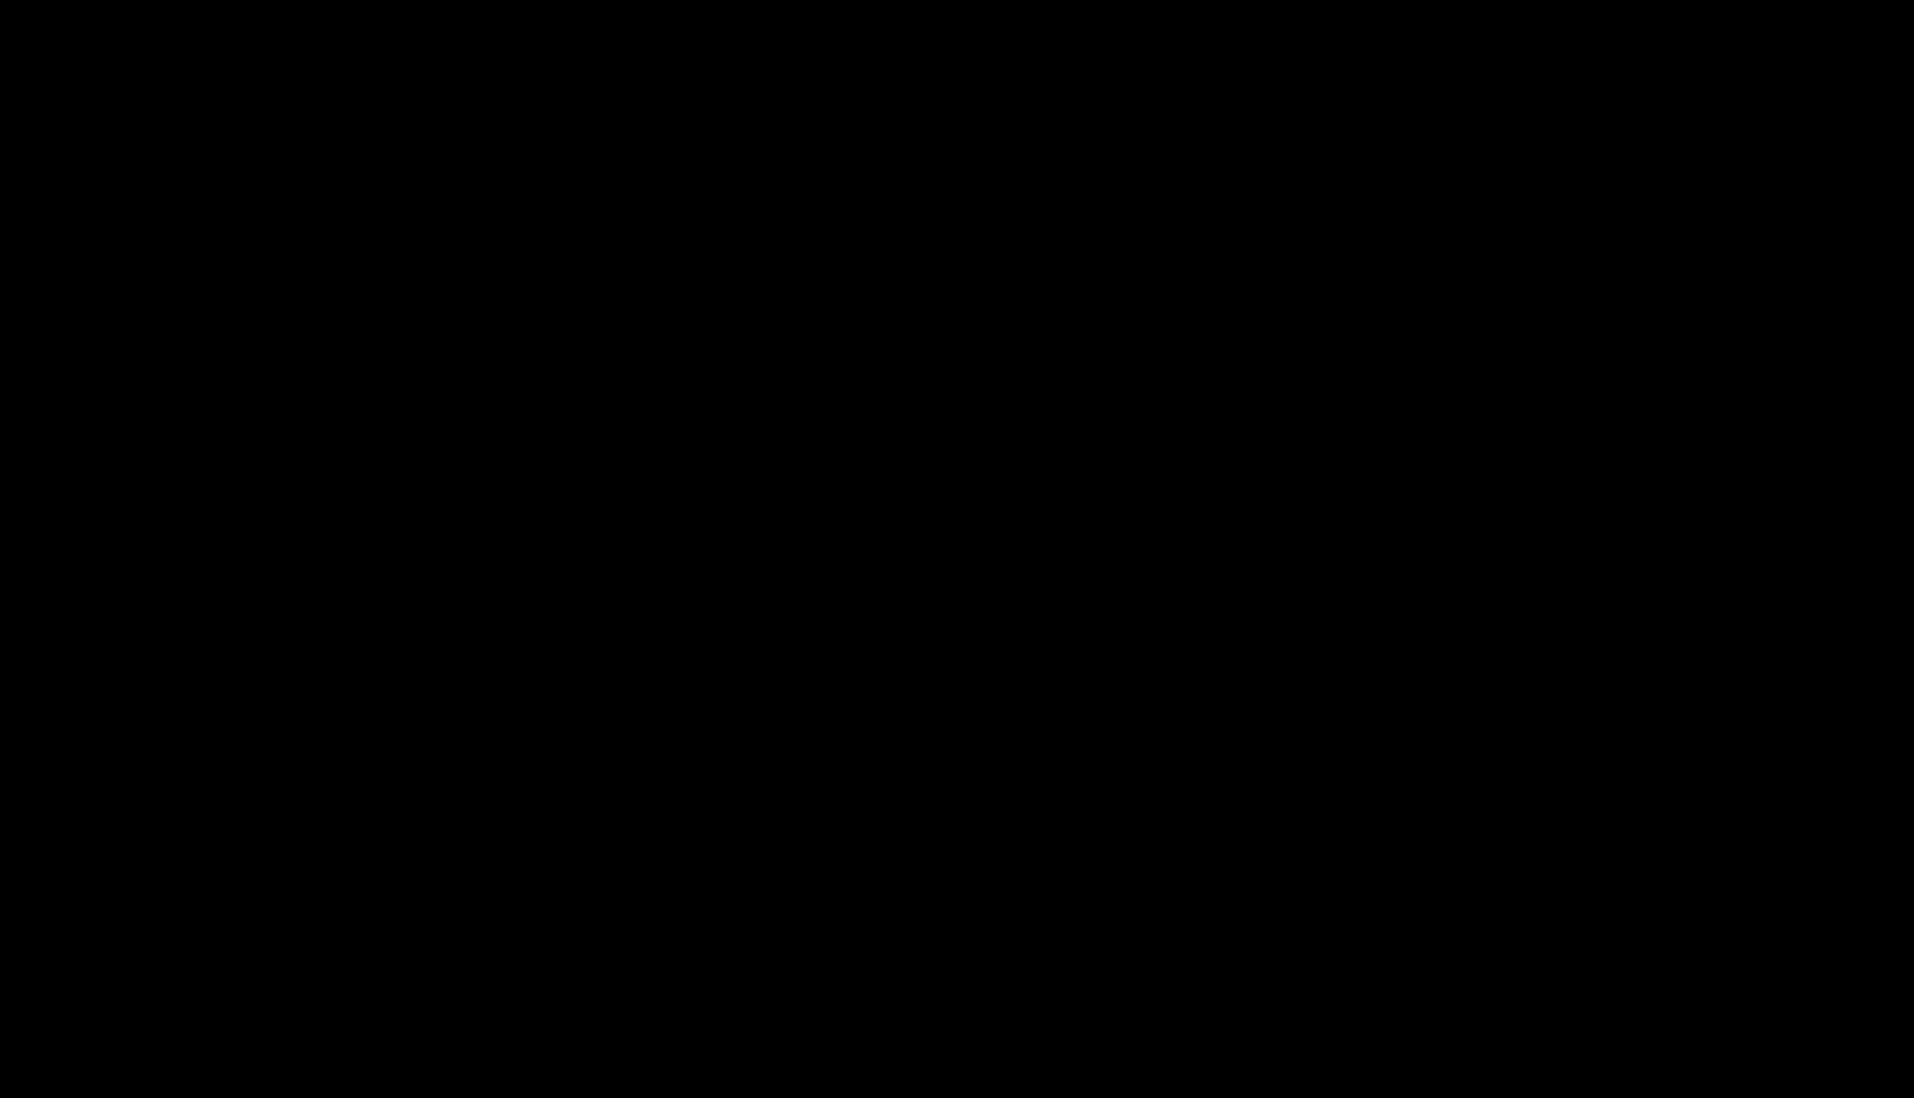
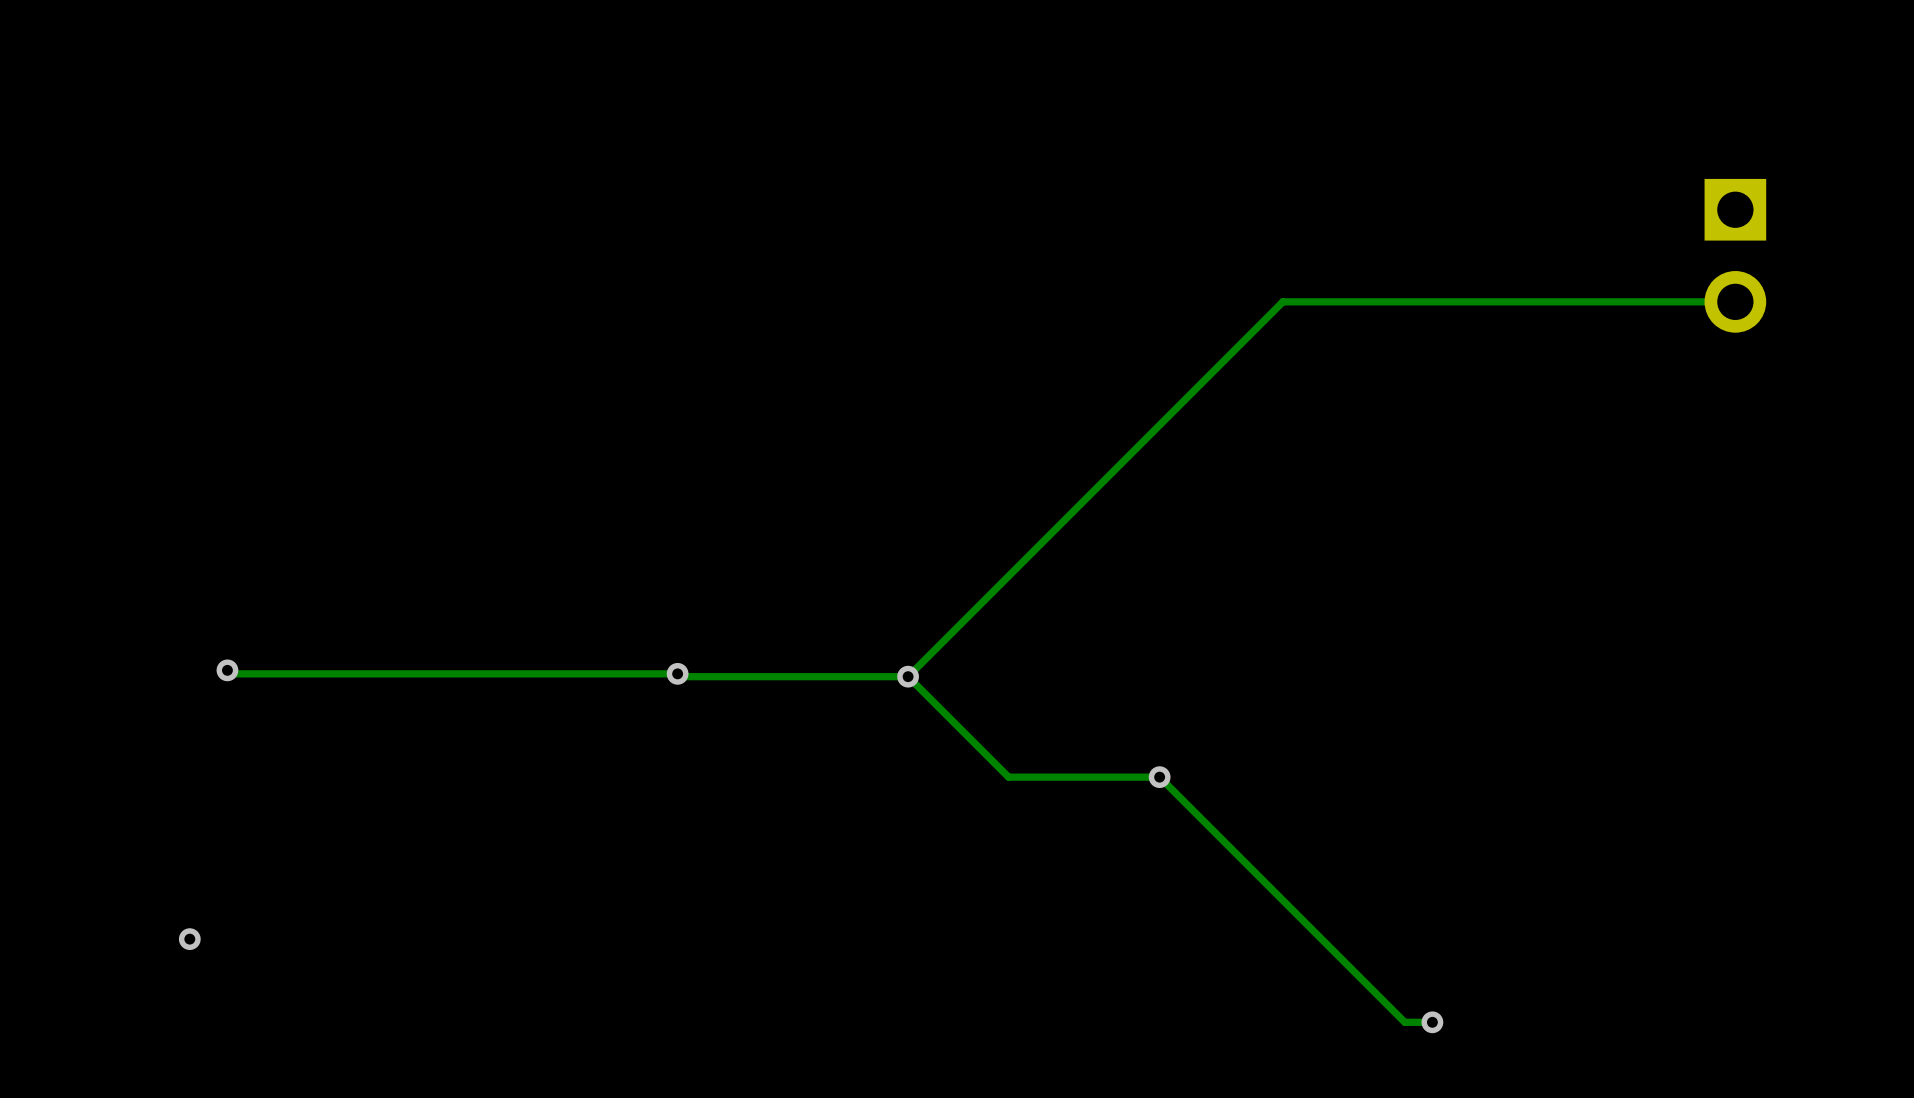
part: none -> (1735, 255)
track: none -> (1735, 301) (1282, 301) (908, 676)
track: none -> (227, 670) (230, 673) (677, 673) (680, 676) (908, 676)
via: none -> (227, 670)
via: none -> (677, 673)
track: none -> (908, 676) (1008, 777) (1159, 777) (1404, 1022) (1432, 1022)
via: none -> (908, 676)
via: none -> (1159, 777)
via: none -> (189, 939)
via: none -> (1432, 1022)

